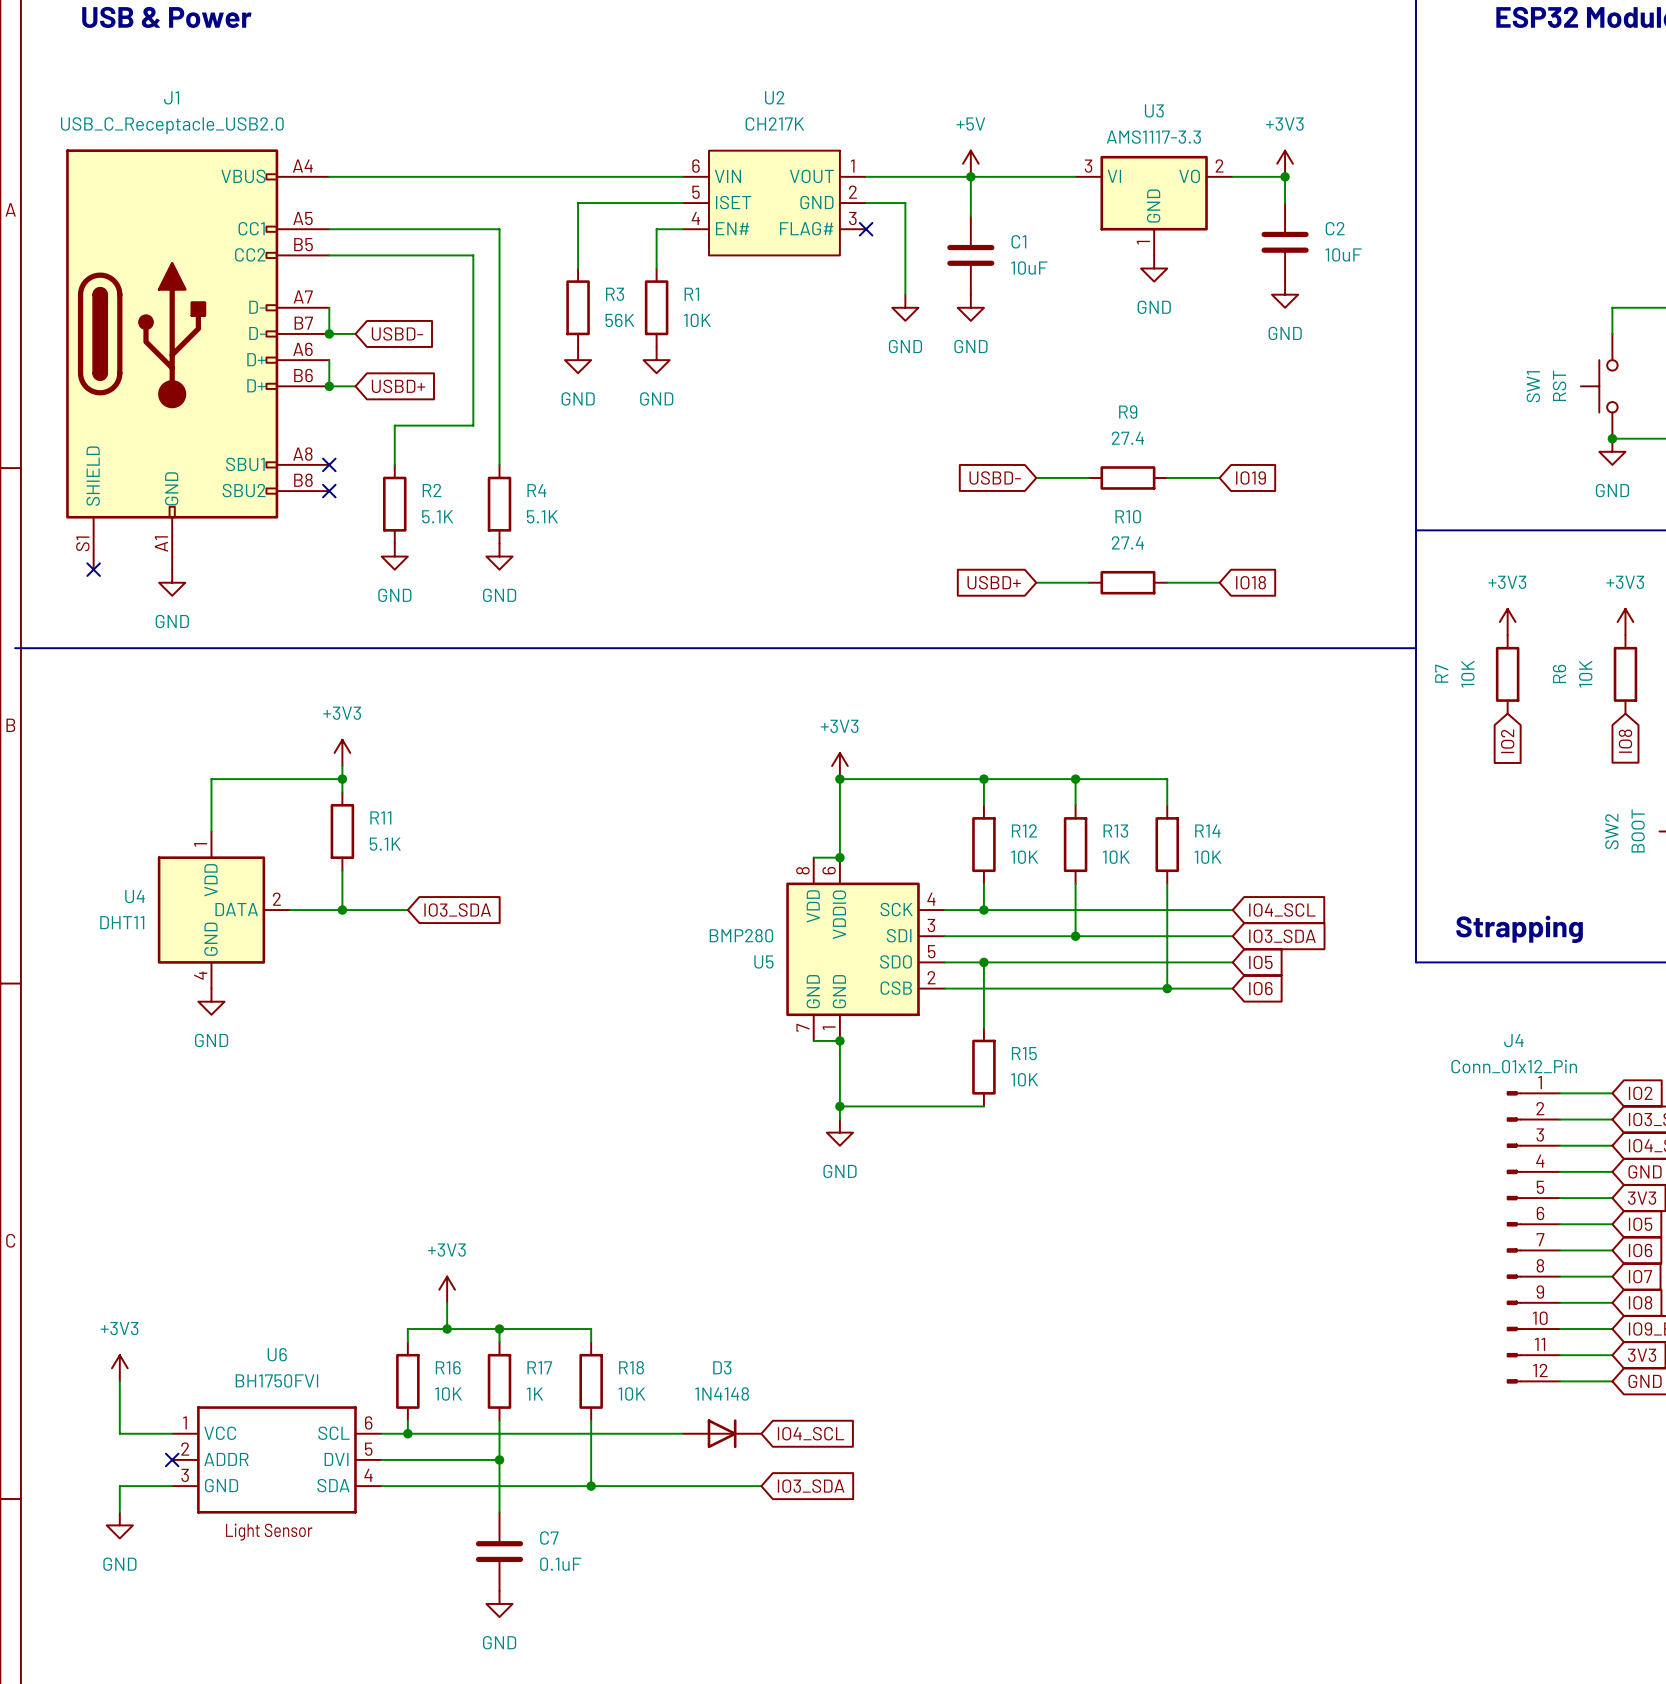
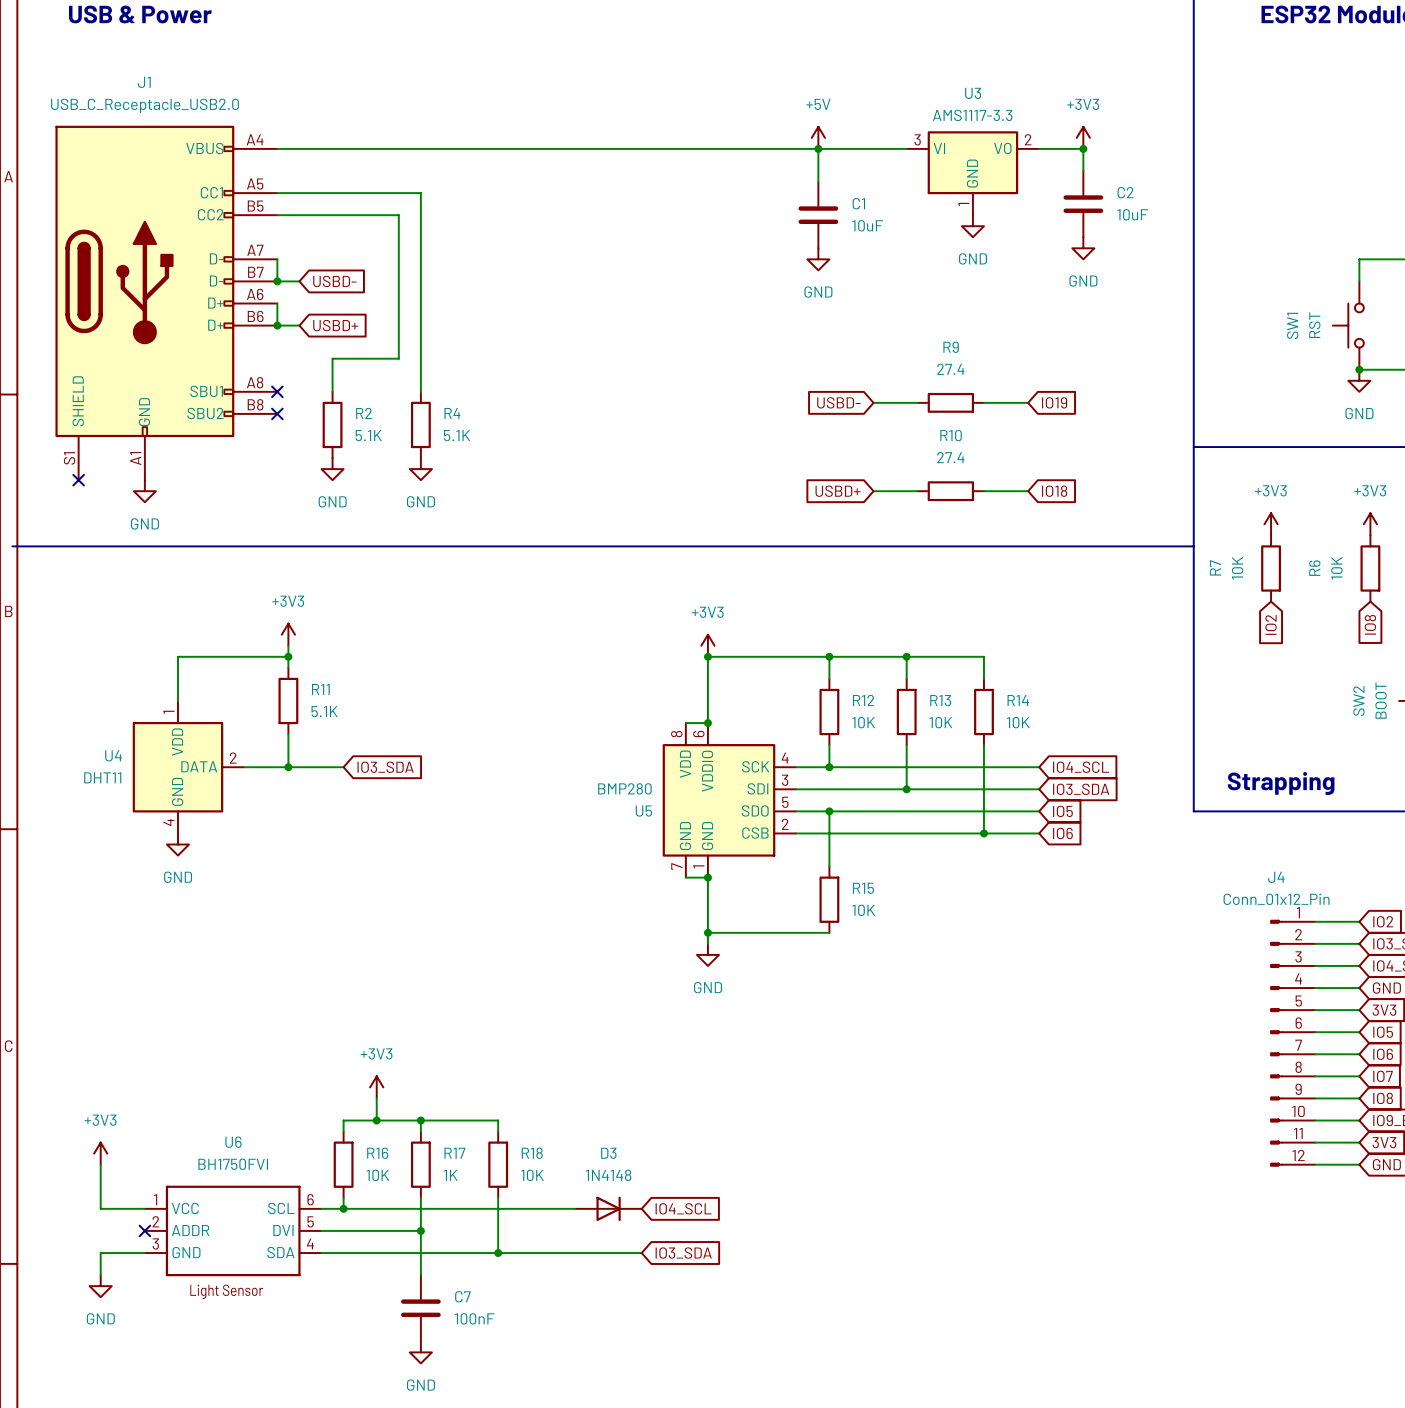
wire: (682, 203) (578, 203) (578, 268) -> none
U2: CH217K (774, 203) -> none
wire: (866, 203) (905, 203) (905, 294) -> none
wire: (682, 229) (656, 229) (656, 268) -> none
no-connect mark: (866, 229) -> none
R3: 56K (578, 307) -> none
R1: 10K (656, 307) -> none
power symbol: GND (905, 307) -> none
power symbol: GND (578, 360) -> none
power symbol: GND (656, 360) -> none
C7 value: 0.1uF (560, 1564) -> 100nF (474, 1318)

